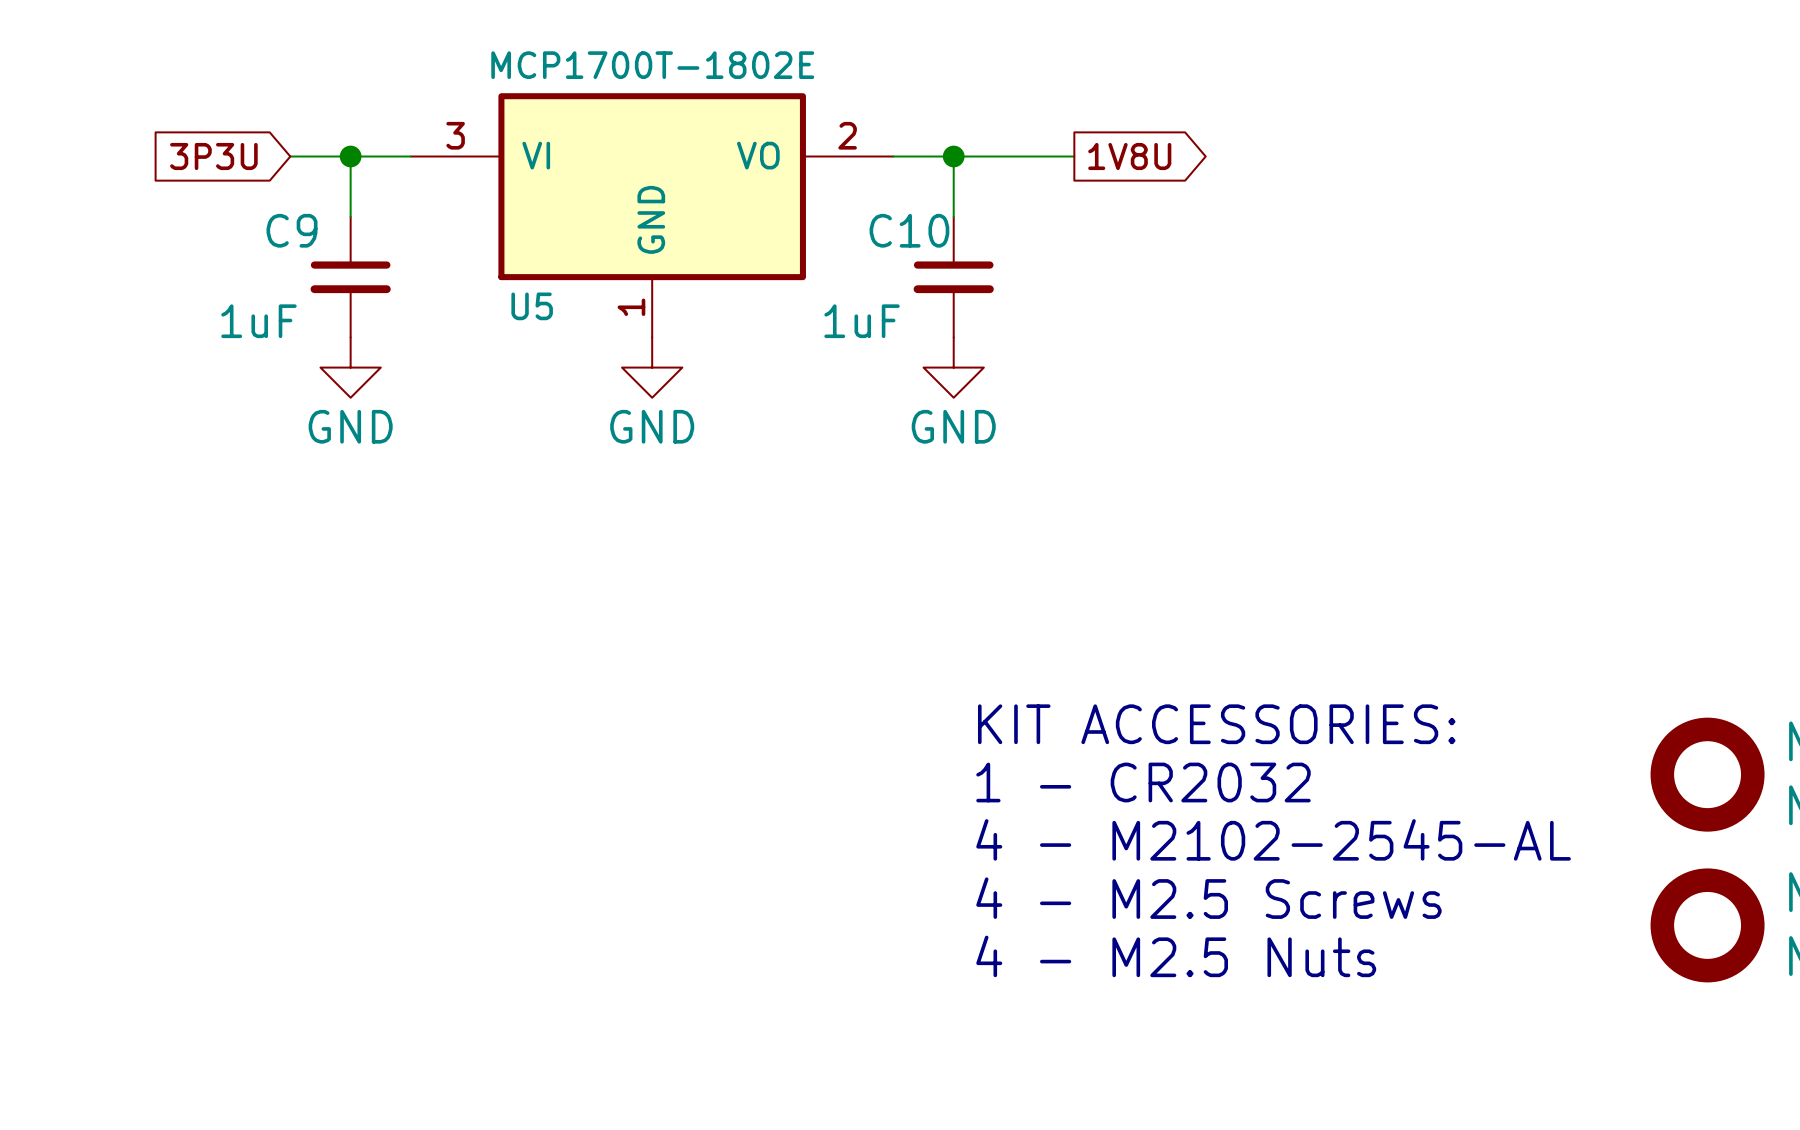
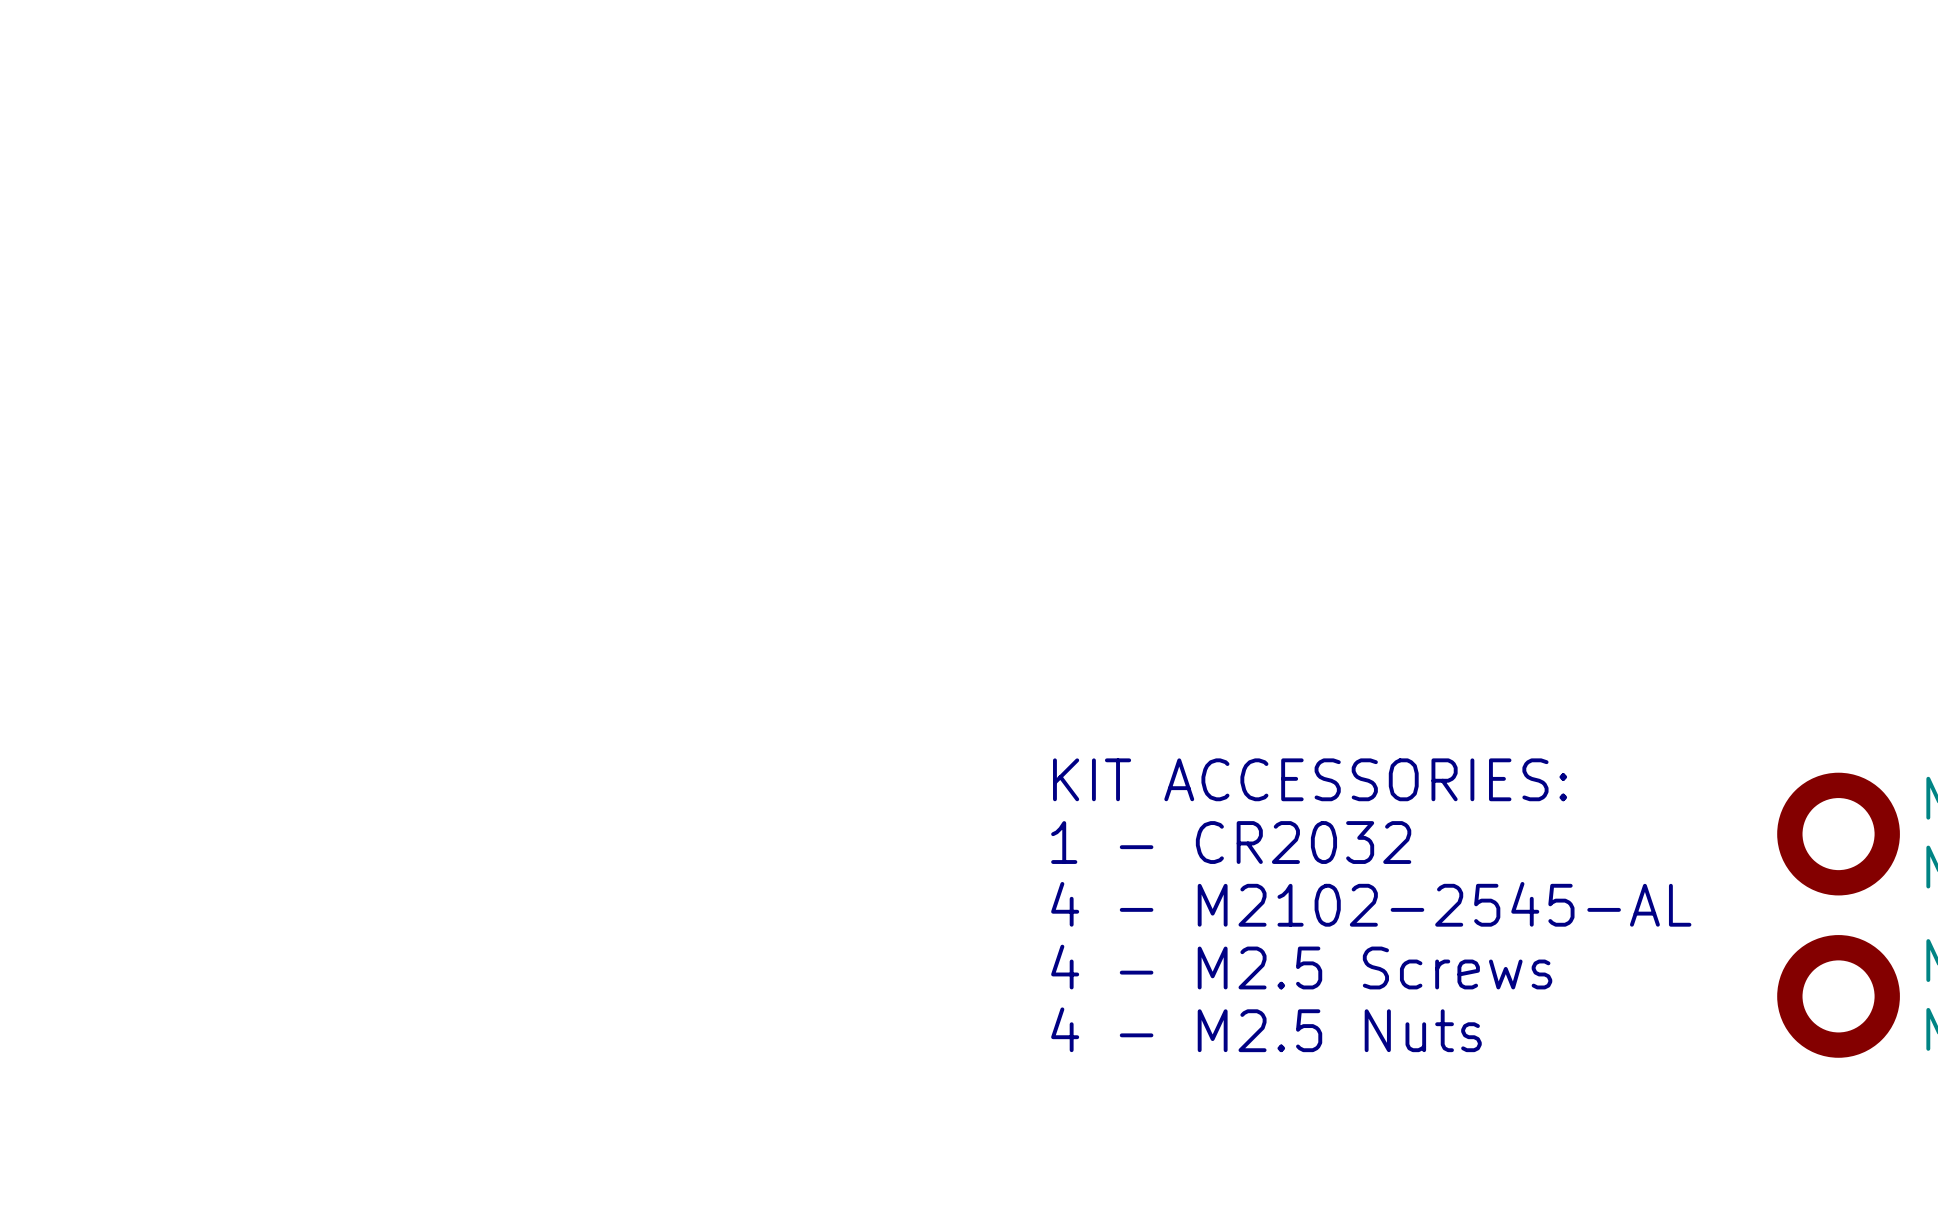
global label: 3P3U (213, 156) -> none
wire: (290, 156) (410, 156) -> none
wire: (350, 156) (350, 216) -> none
junction: (350, 156) -> none
wire: (893, 156) (1074, 156) -> none
wire: (953, 156) (953, 216) -> none
junction: (953, 156) -> none
global label: 1V8U (1129, 156) -> none
U5: MCP1700T-1802E (652, 215) -> none
C9: 1uF (350, 277) -> none
C10: 1uF (953, 277) -> none
power symbol: GND (350, 367) -> none
power symbol: GND (652, 367) -> none
power symbol: GND (953, 367) -> none

